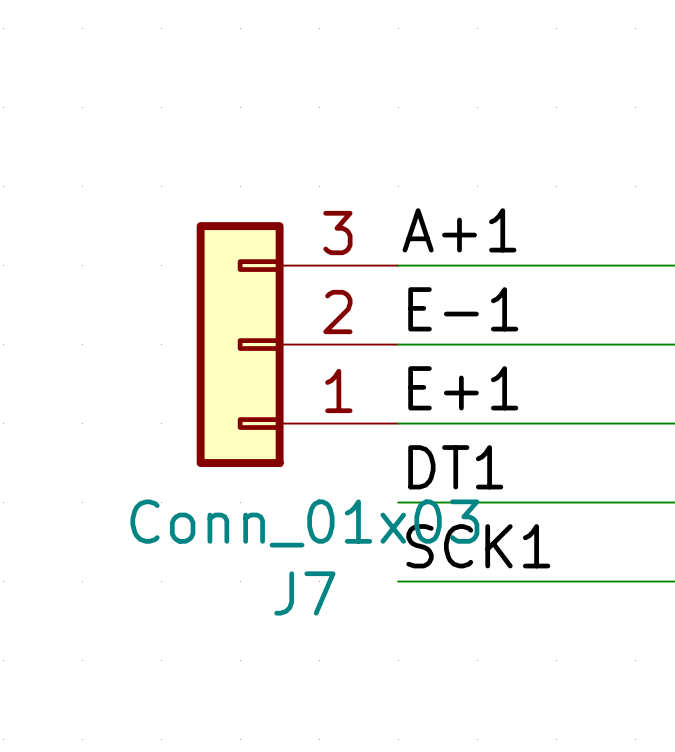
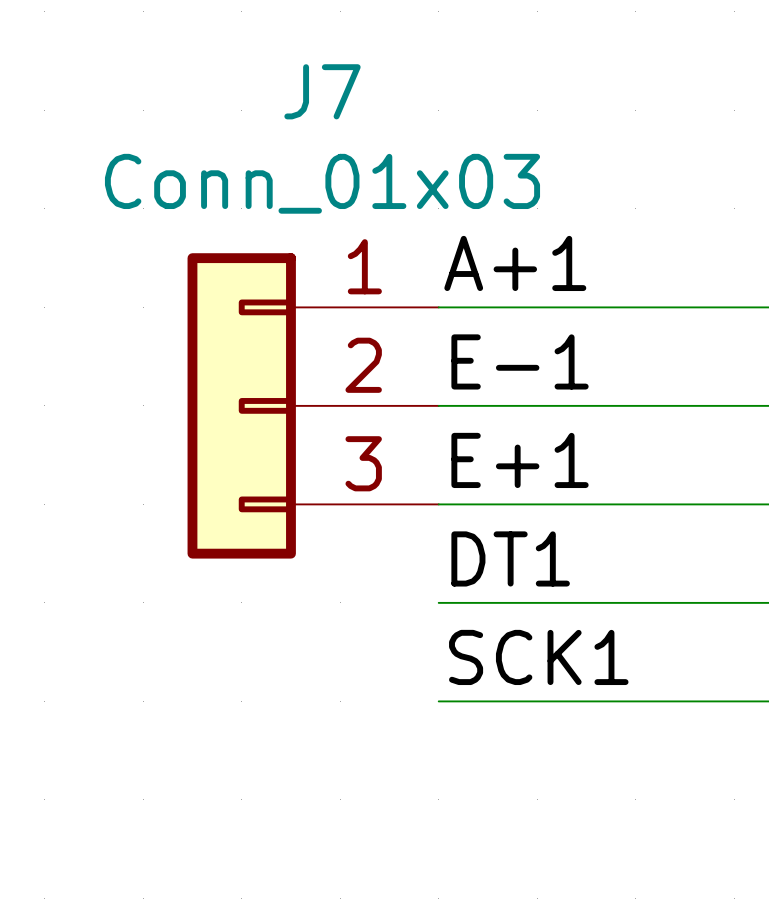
J7 flip: as is (240, 344) -> up-down (241, 405)

